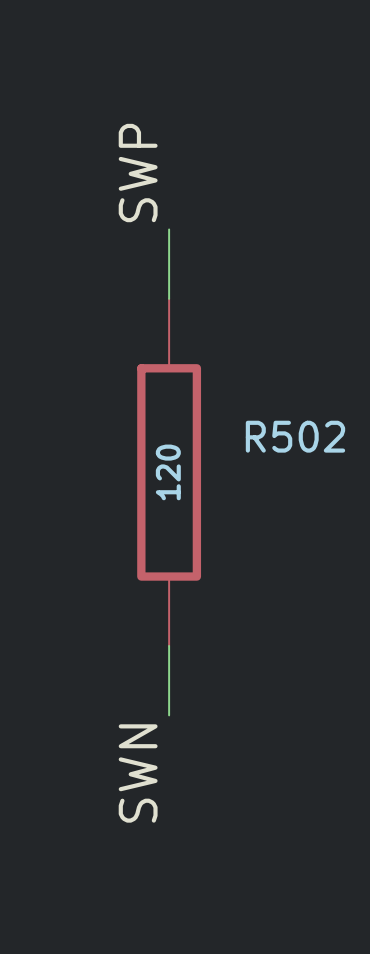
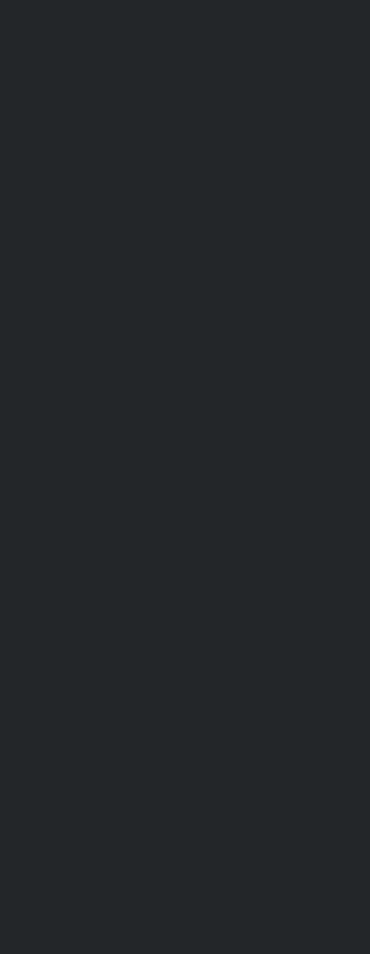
label: SWP (138, 173) -> none
wire: (169, 229) (169, 298) -> none
R502: 120 (169, 472) -> none
wire: (169, 645) (169, 715) -> none
label: SWN (138, 773) -> none

